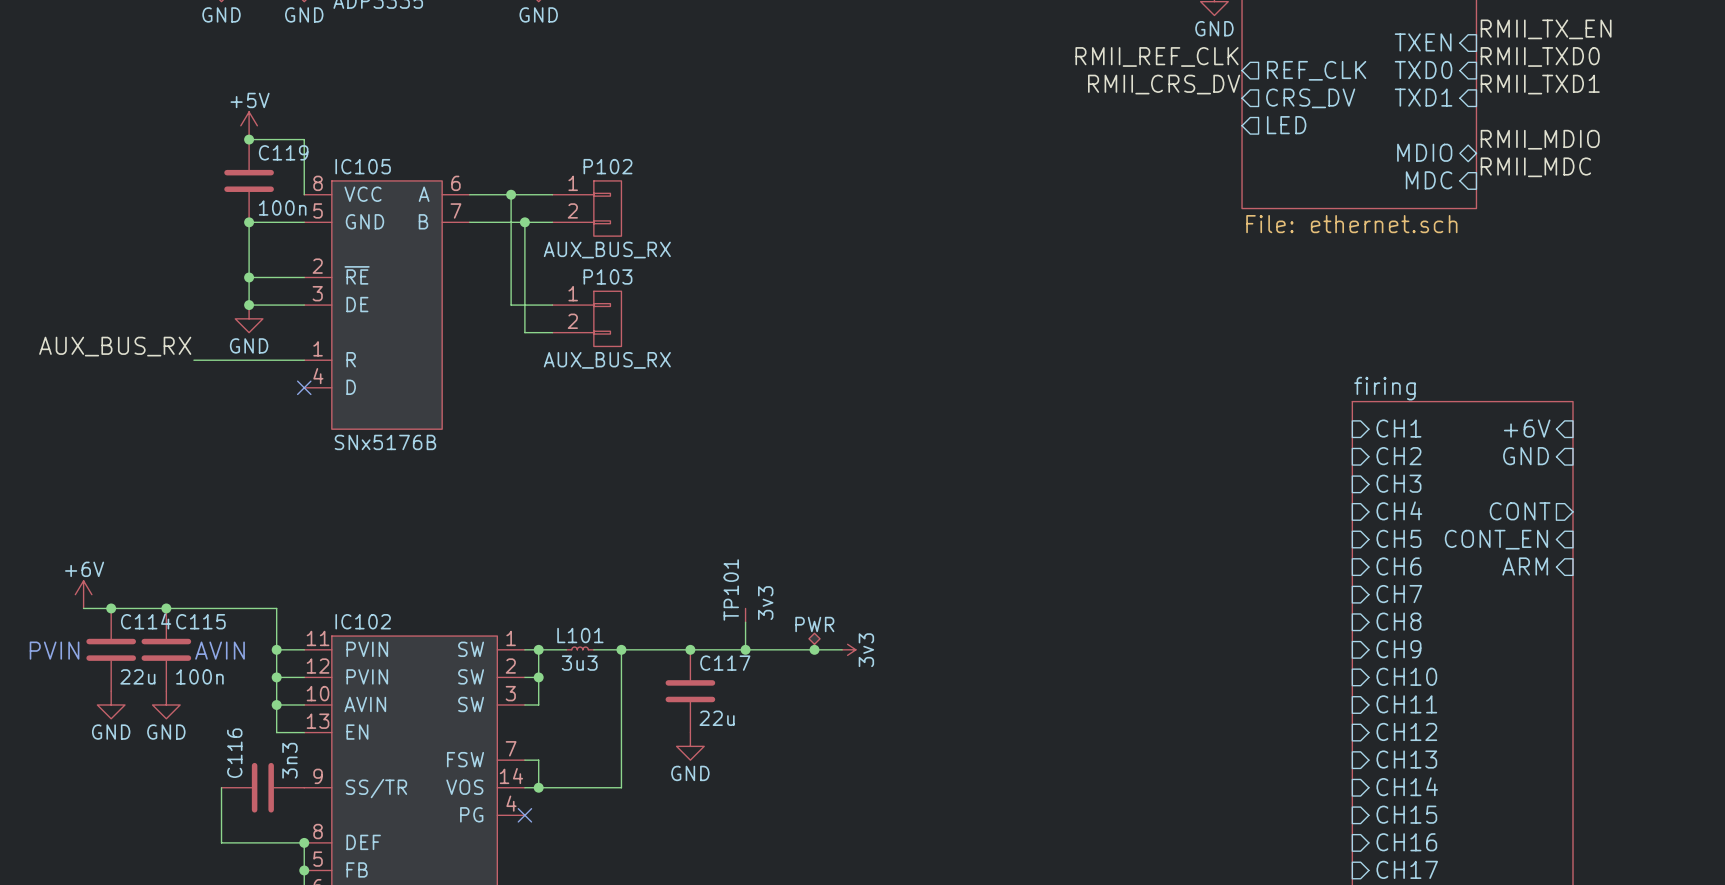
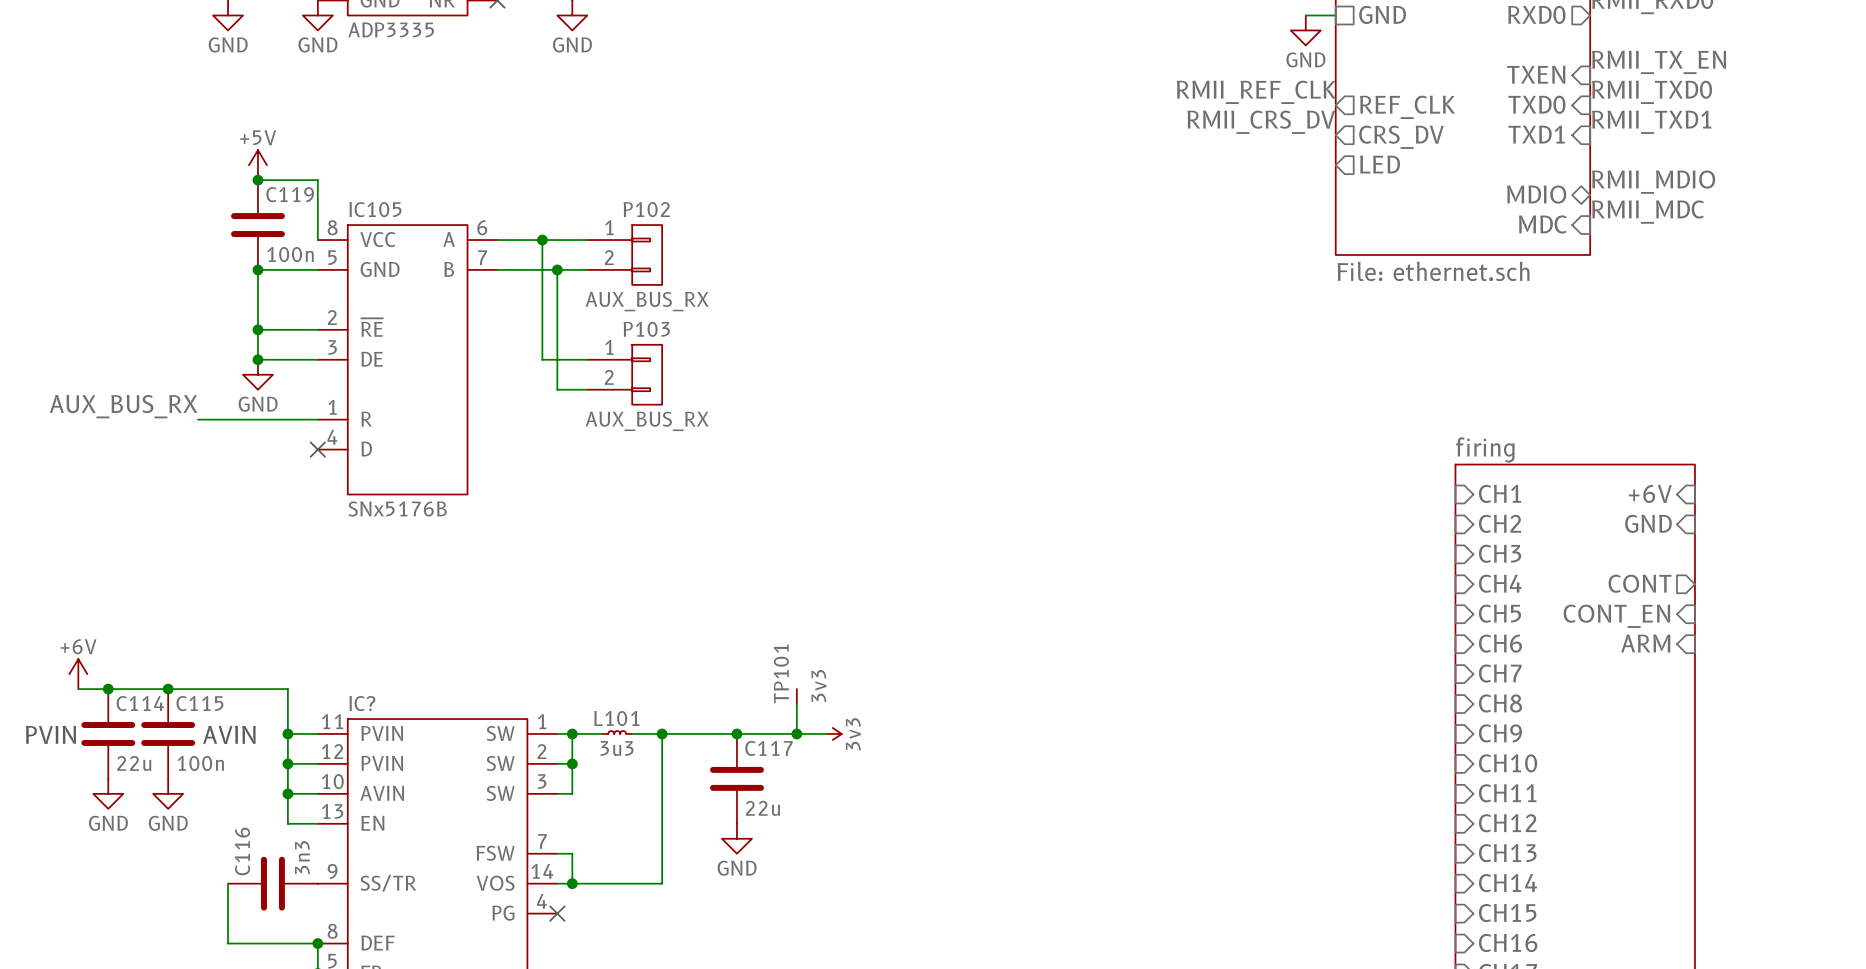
IC102 name: IC102 (363, 621) -> IC? (362, 703)
power symbol: PWR (814, 641) -> none
wire: (773, 649) (842, 649) -> none
junction: (814, 649) -> none
power symbol position: 3v3 (848, 649) -> 3v3 (834, 733)

